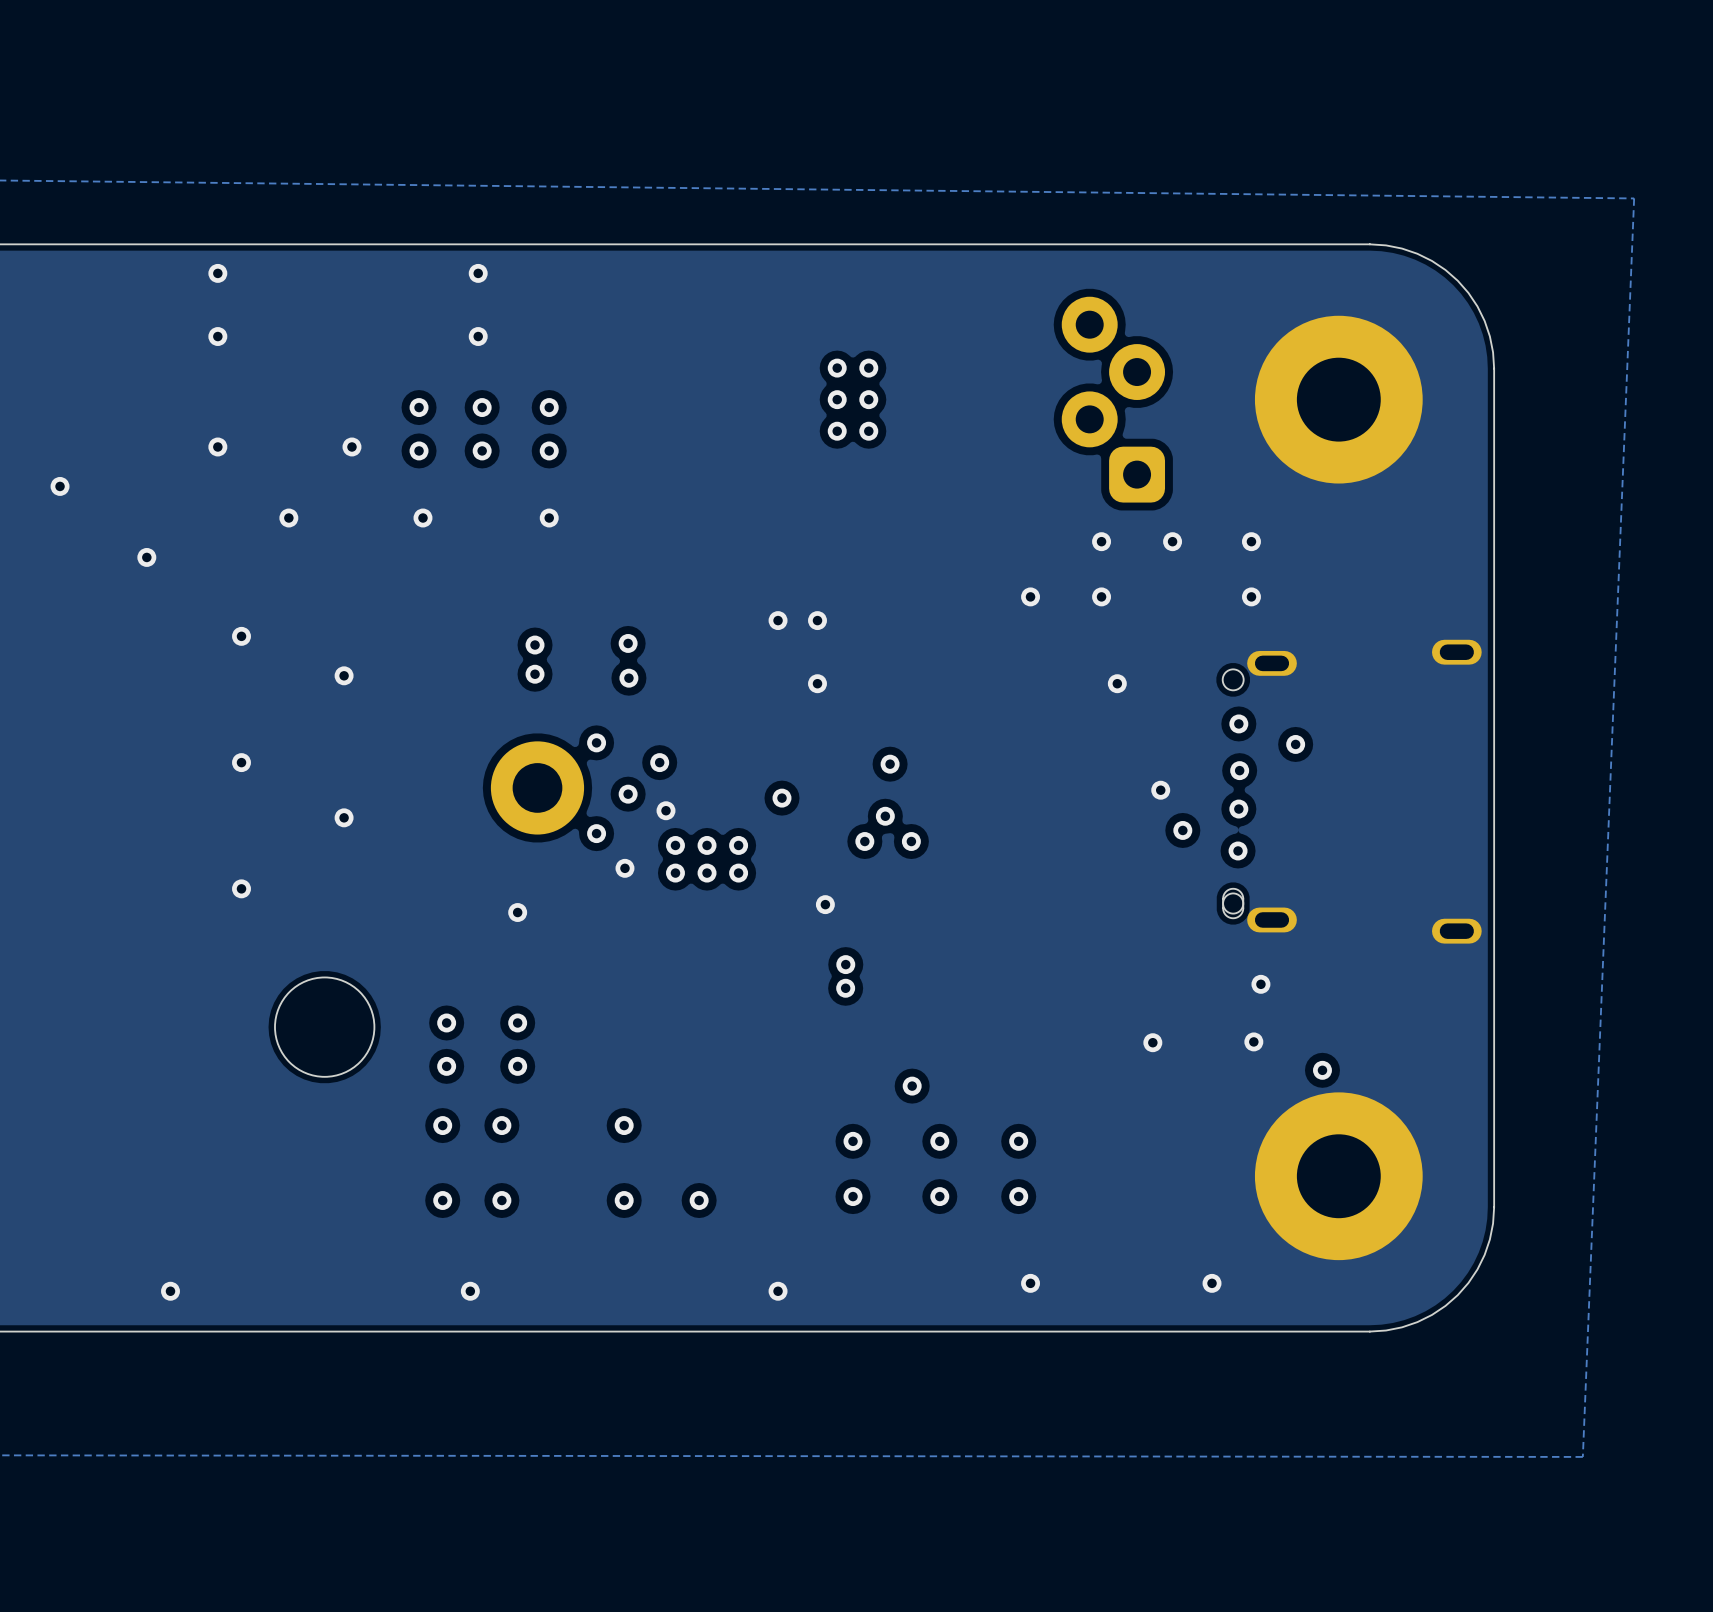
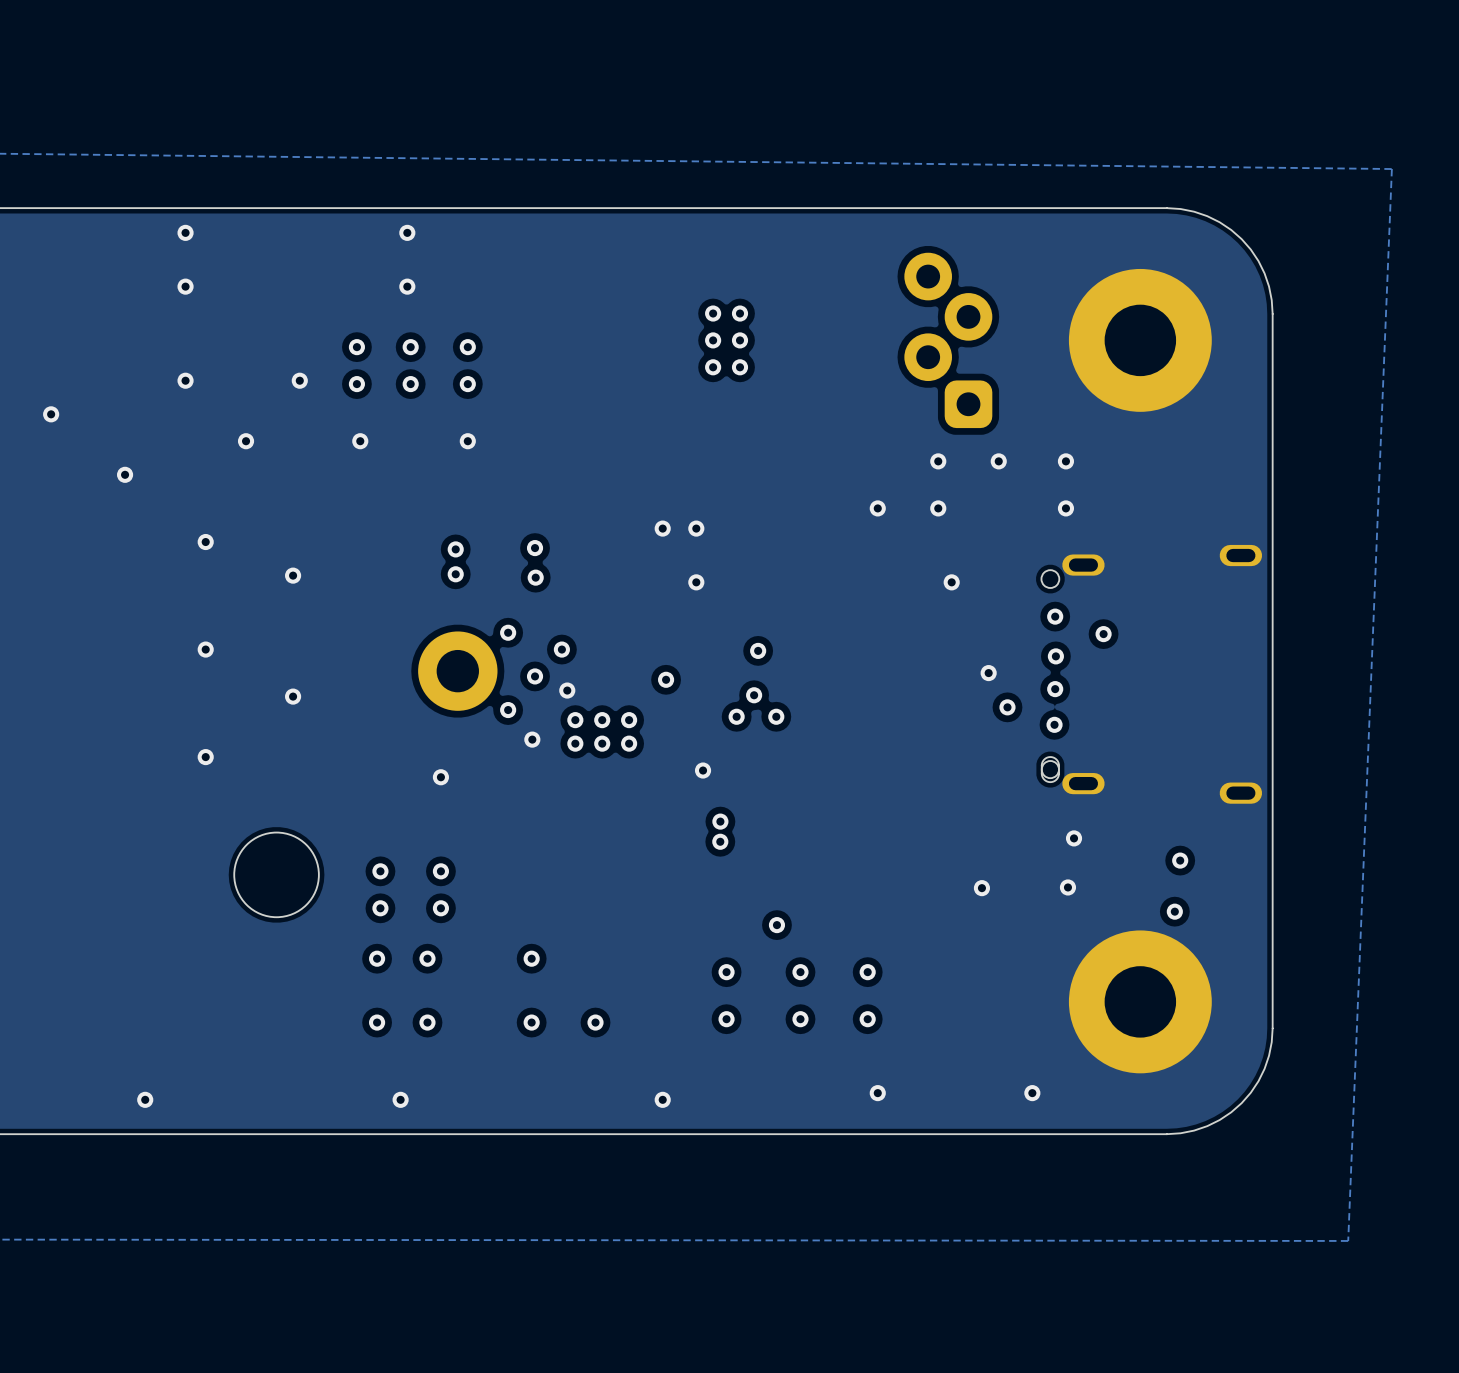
via: none -> (1180, 860)
via: (1322, 1070) -> none
via: none -> (1174, 911)

